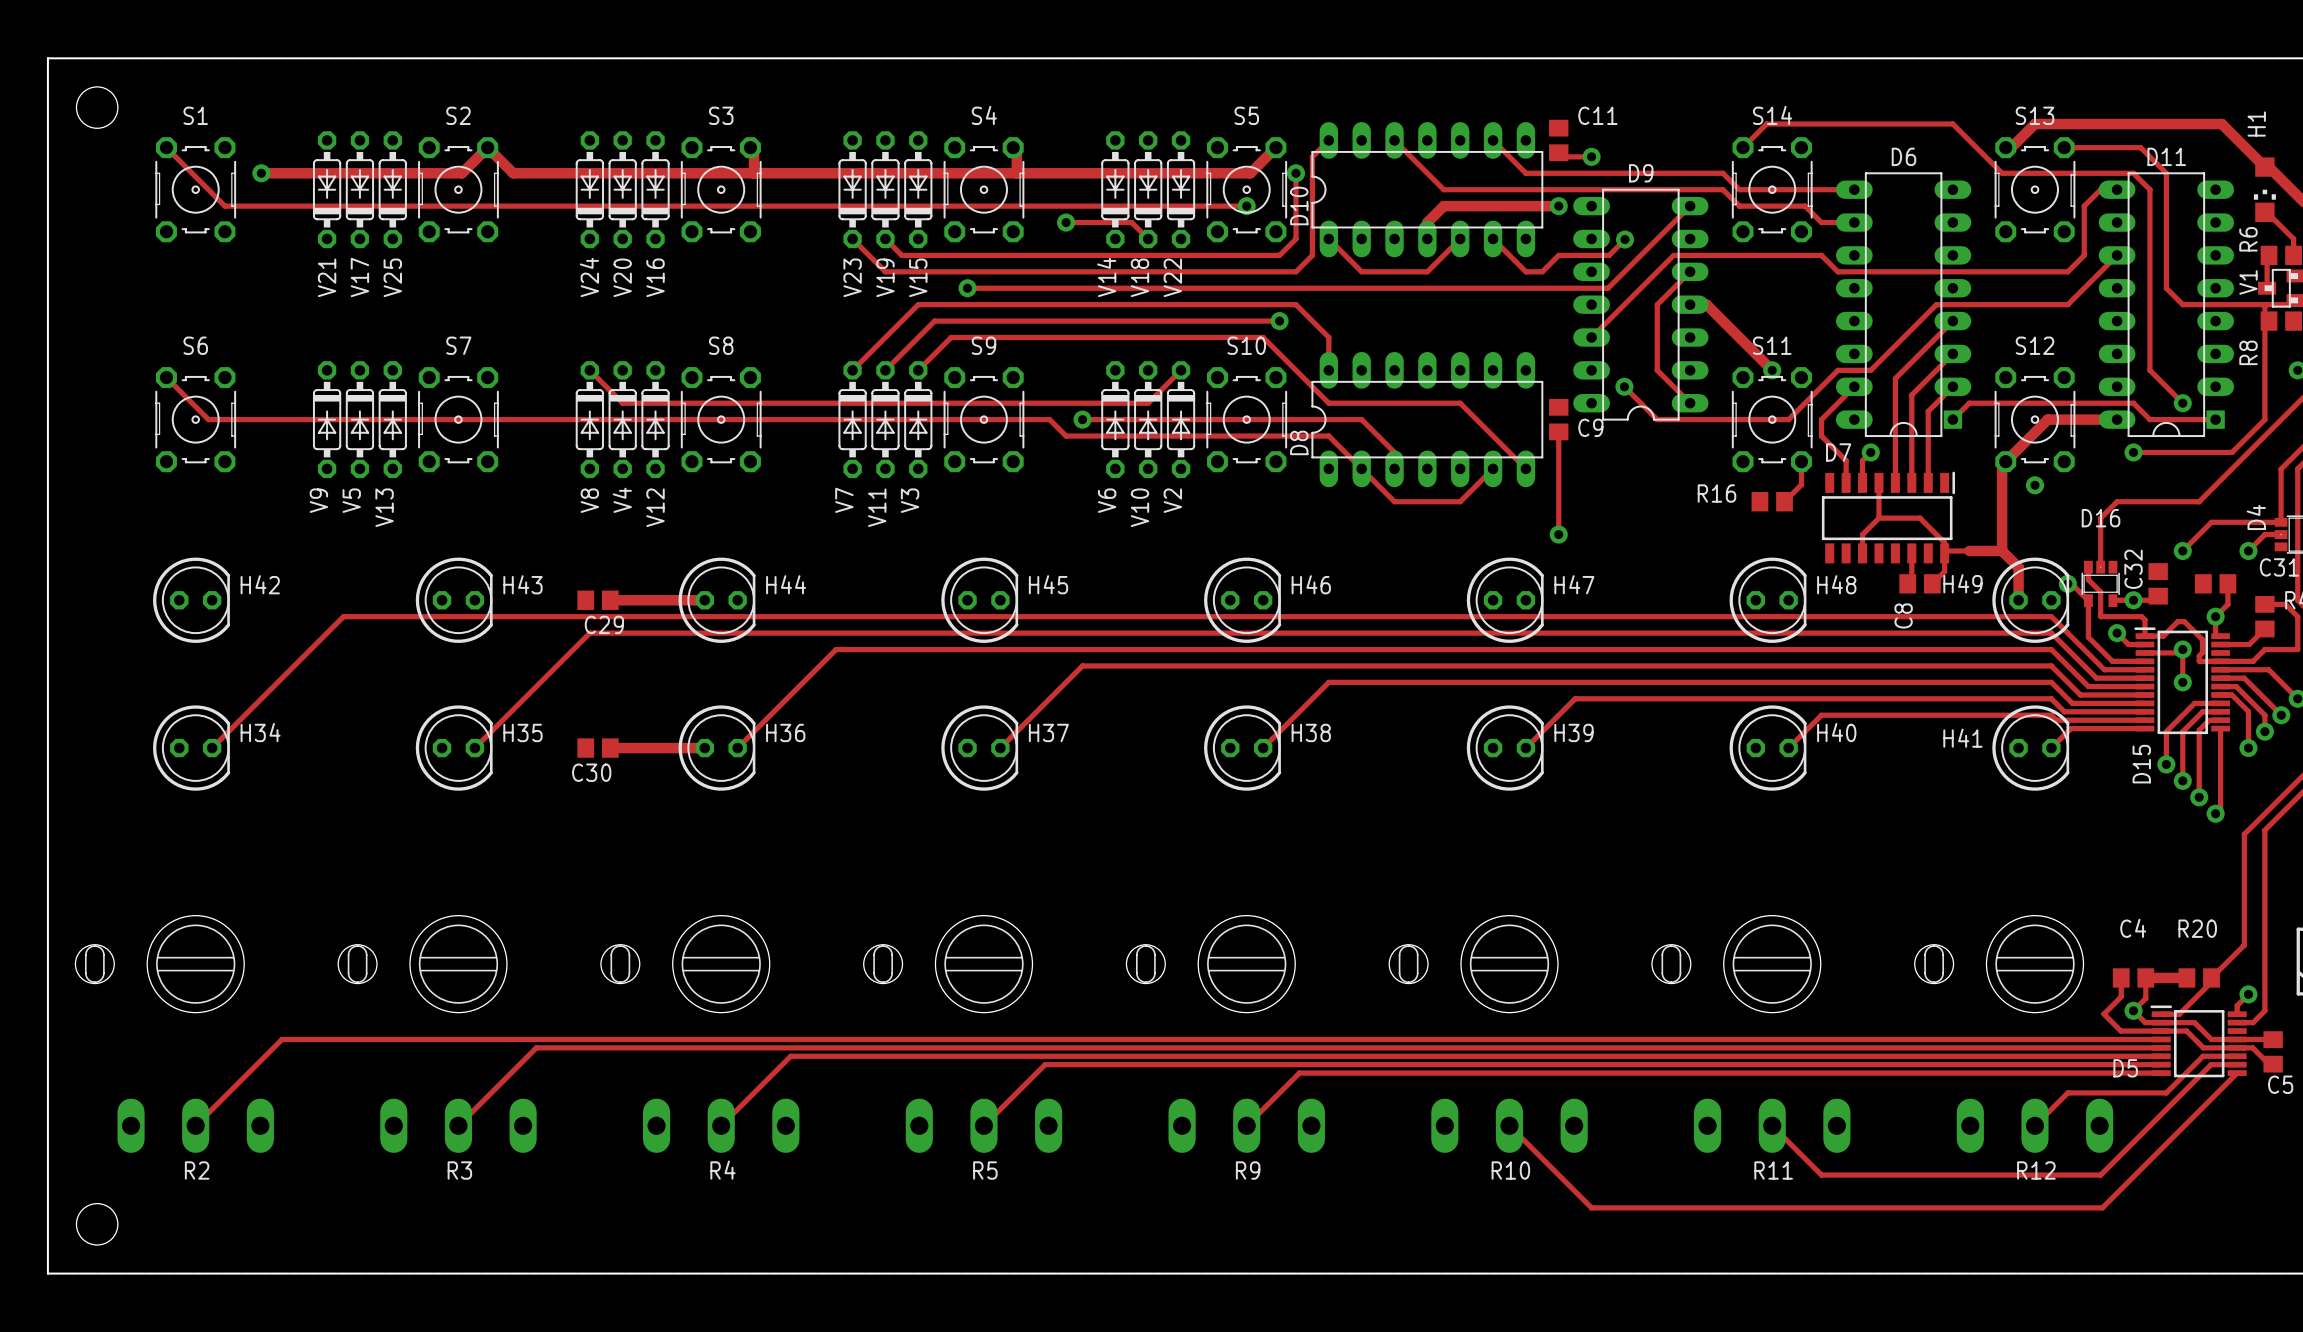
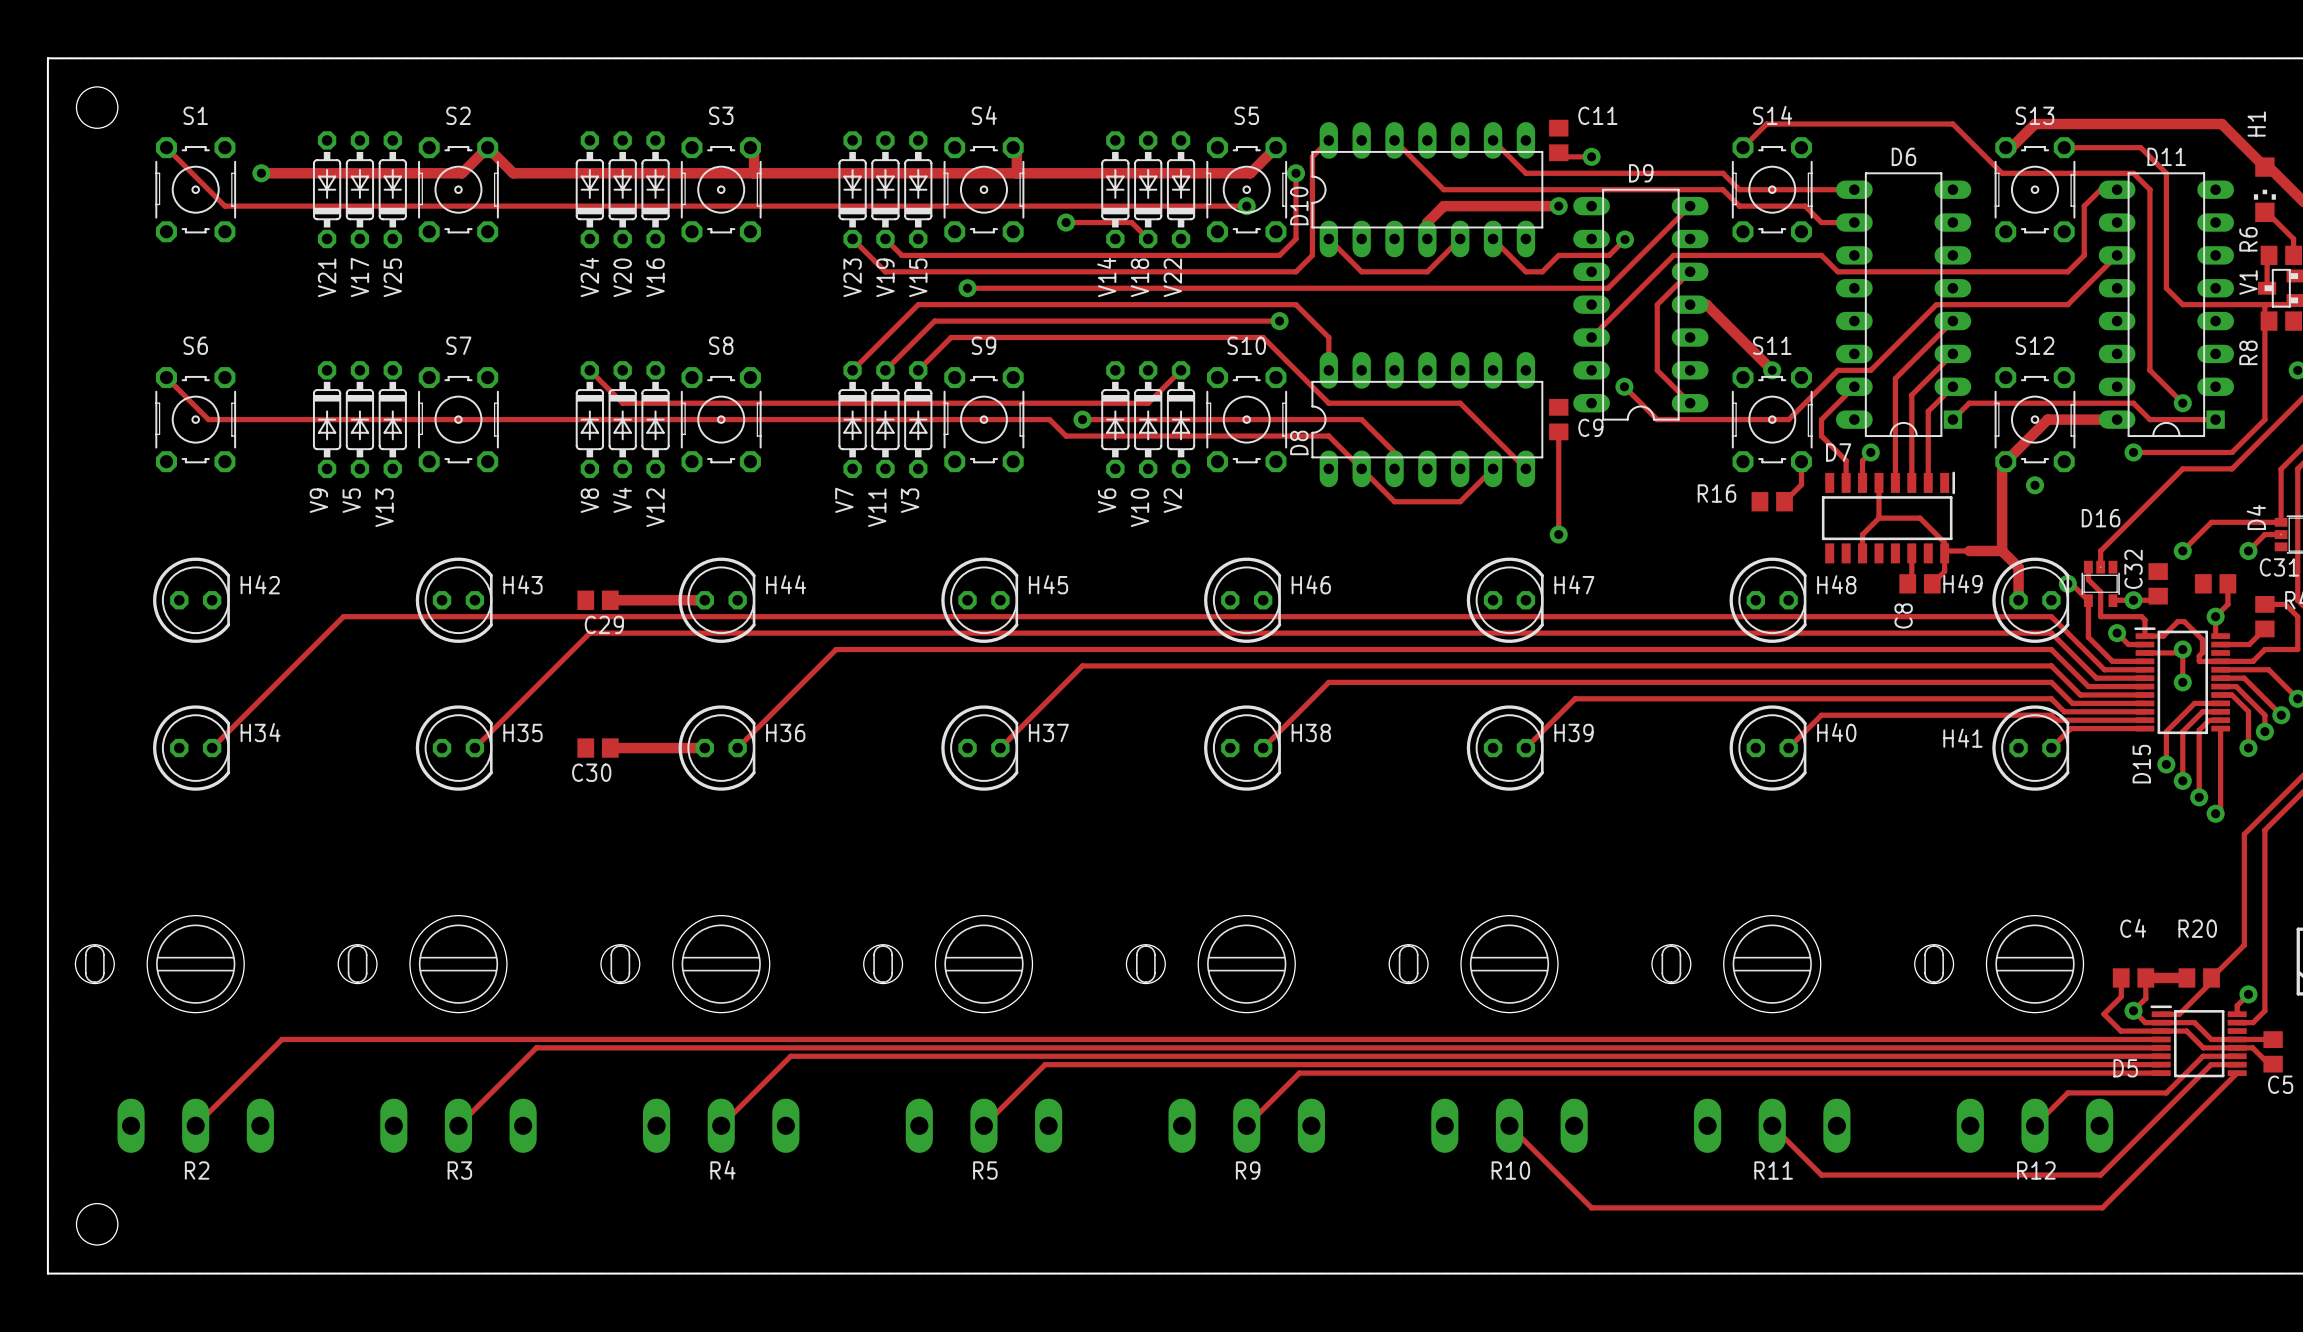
track: (2232, 468) (2199, 501) (2117, 501) (2100, 518) (2100, 550) -> (2232, 468) (2182, 468) (2100, 550)

